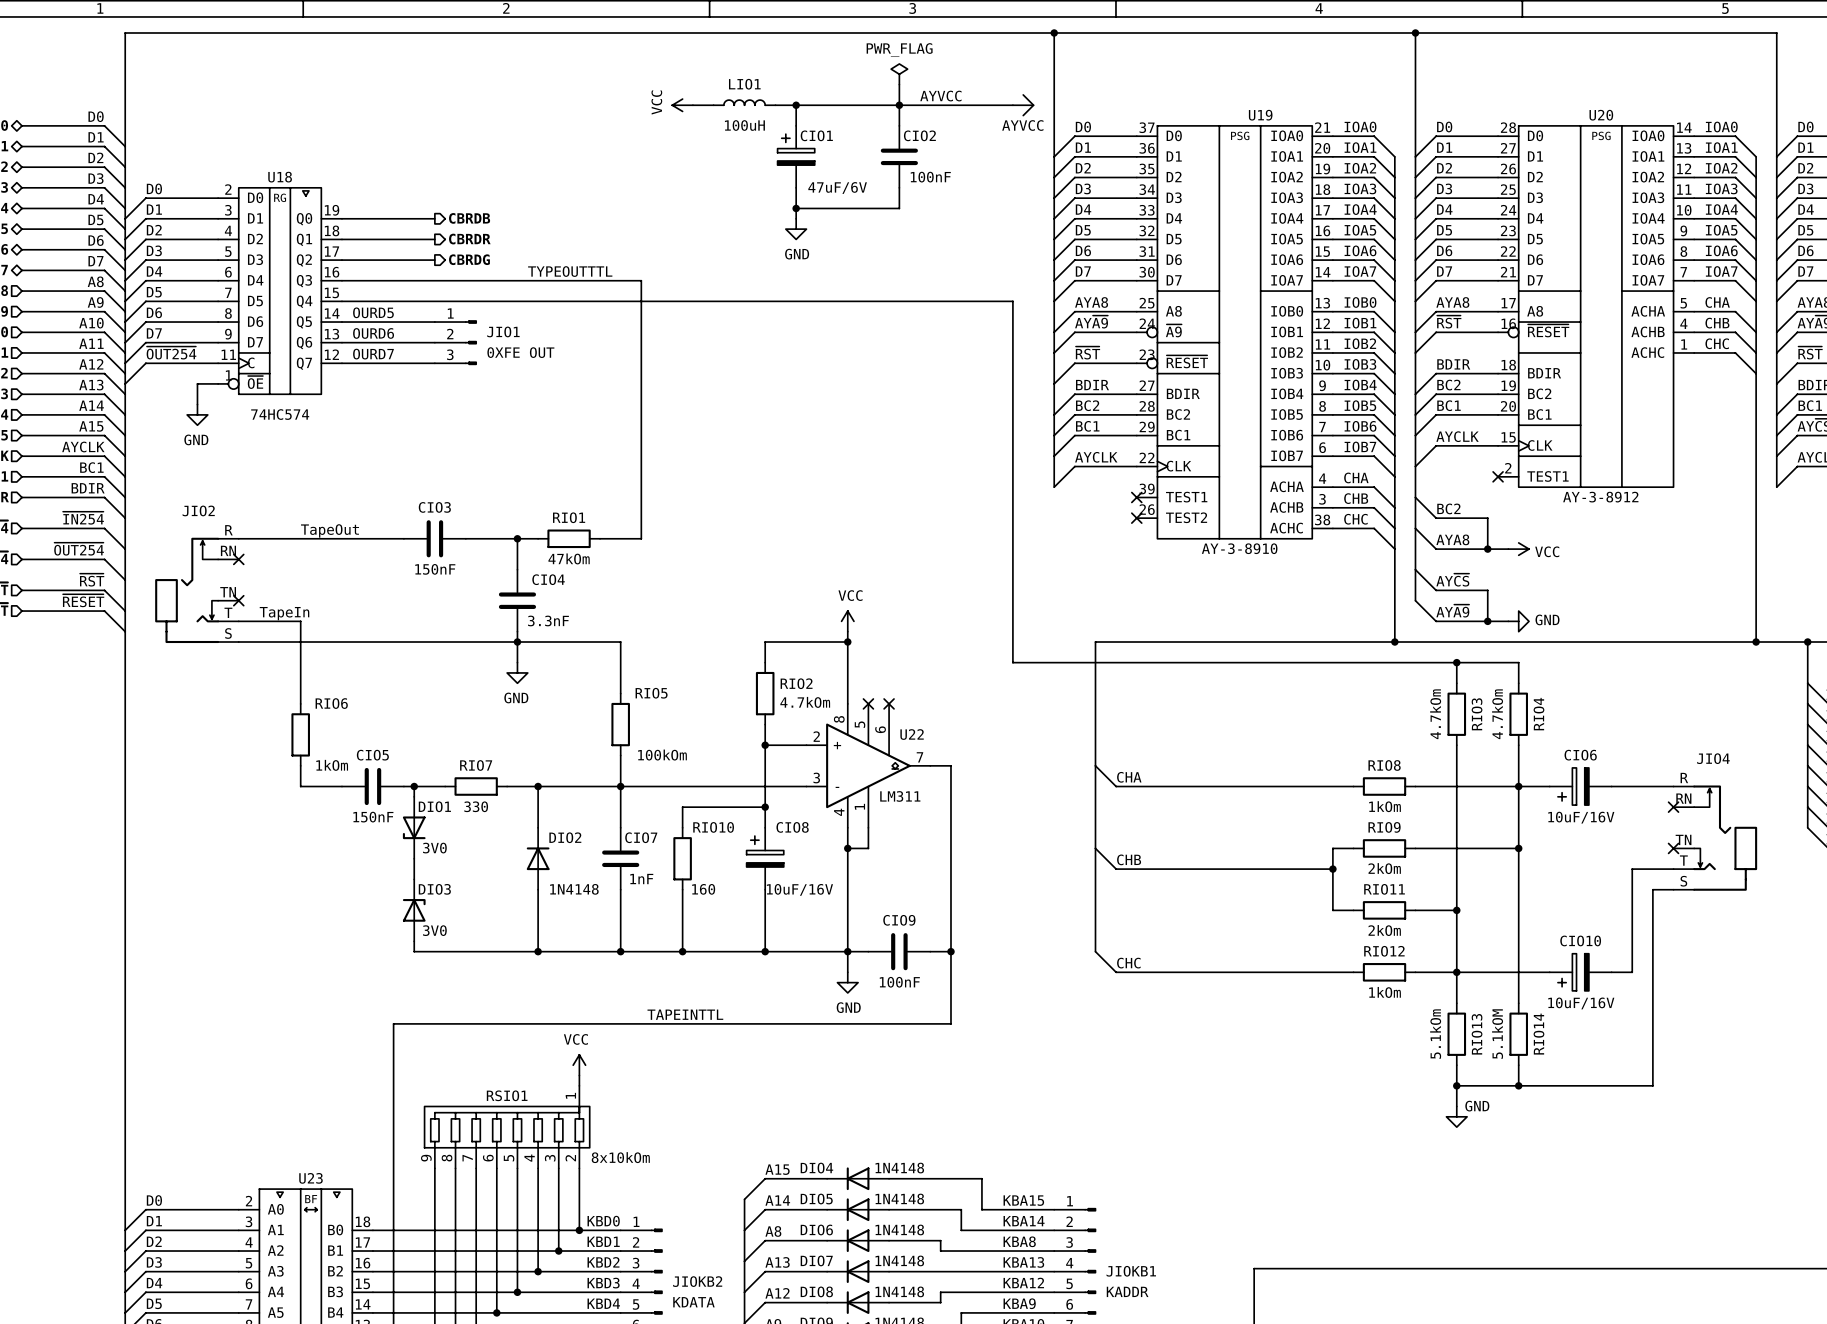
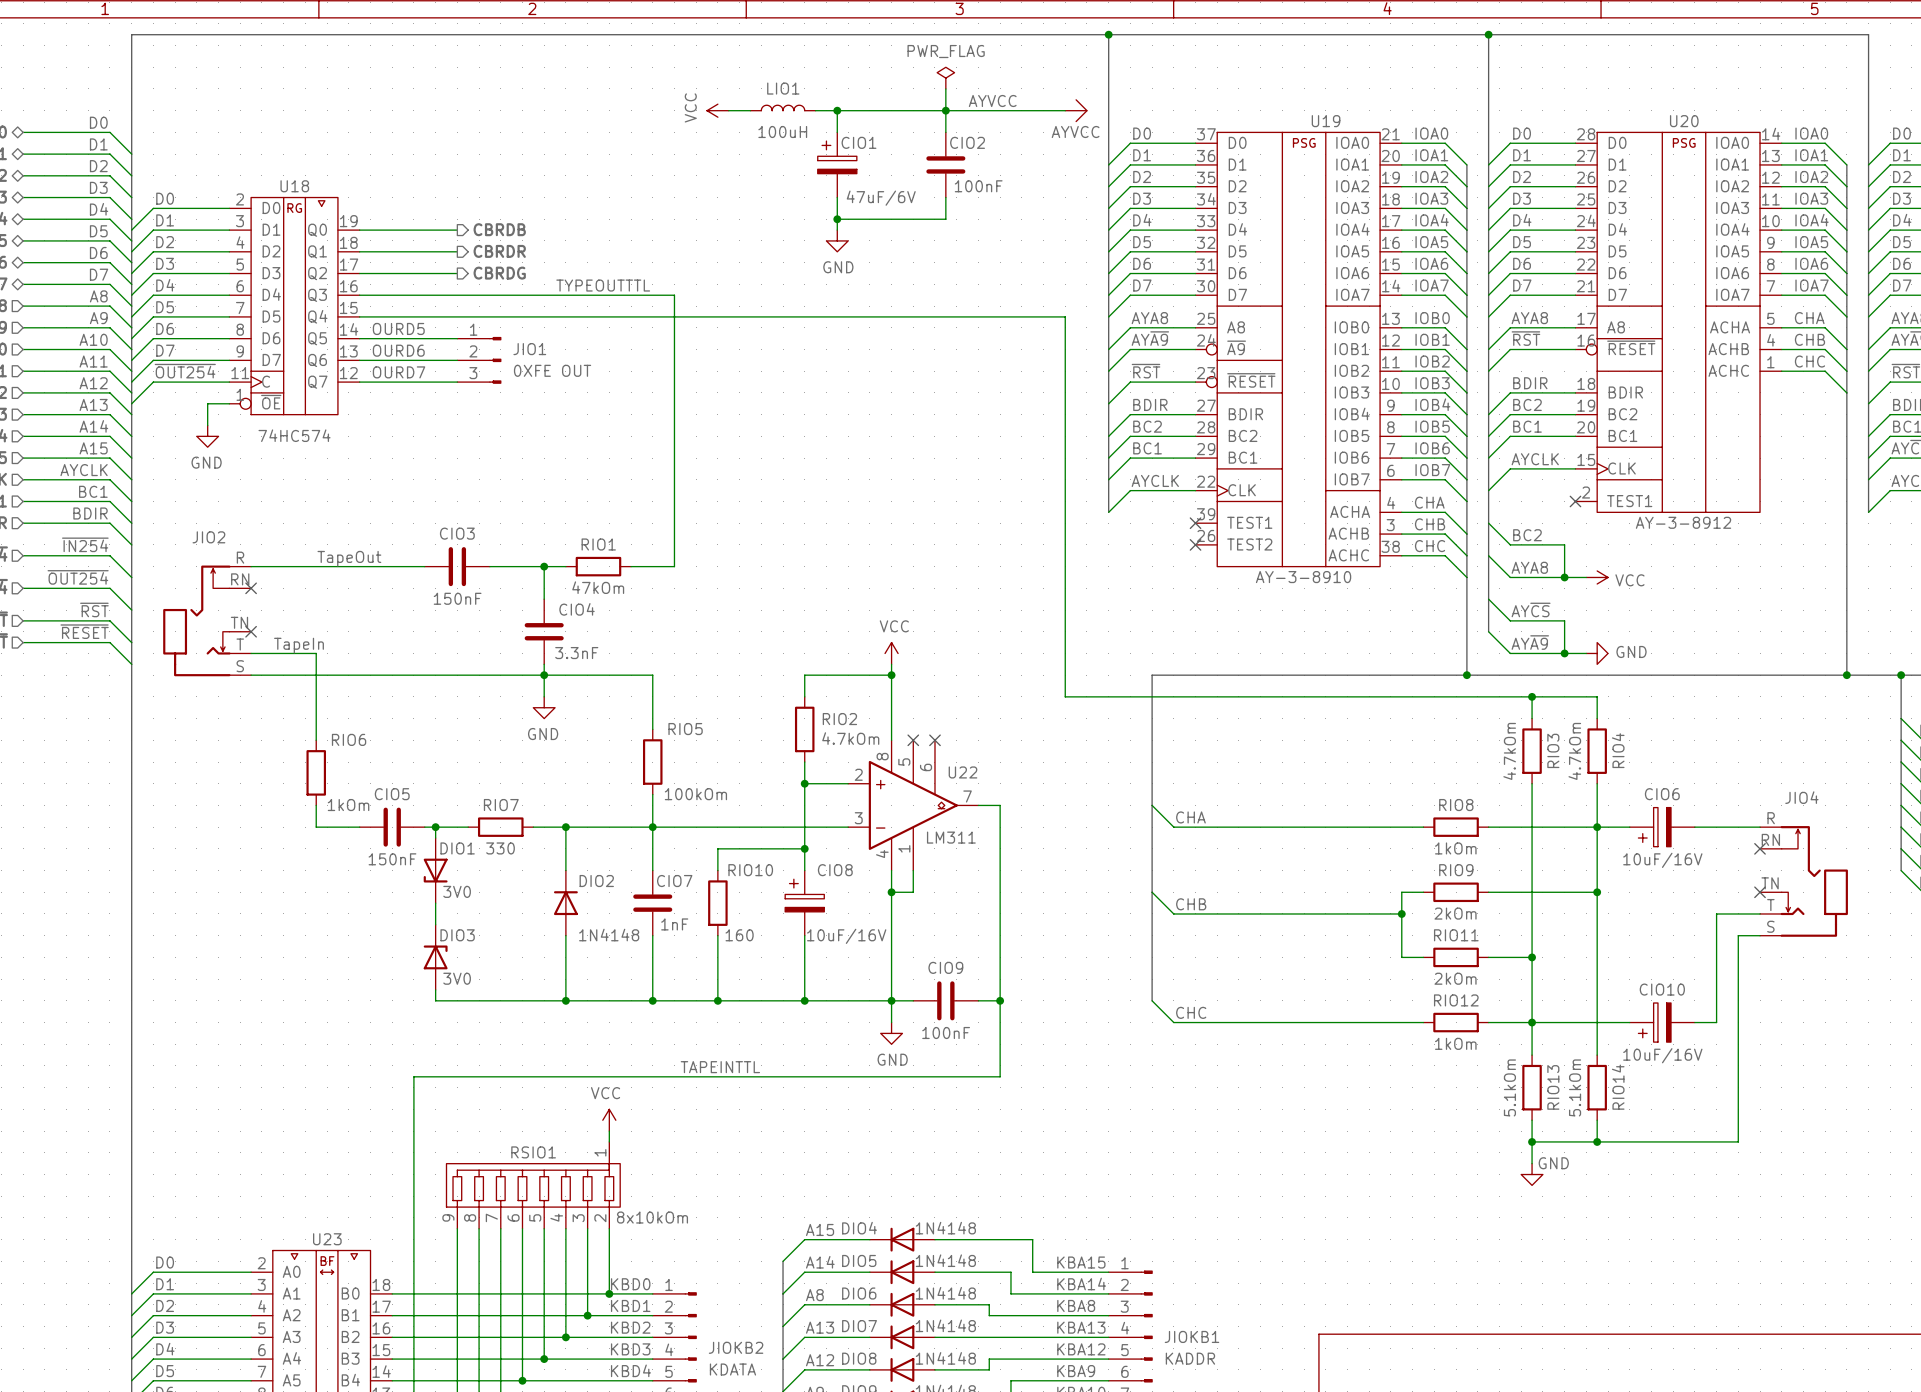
RIO14 value: 5.1kOM (1497, 1034) -> 5.1kOm (1575, 1087)

